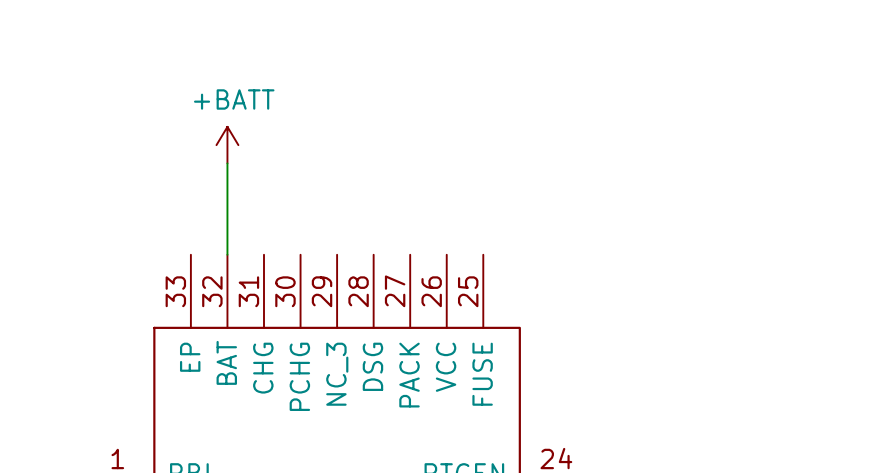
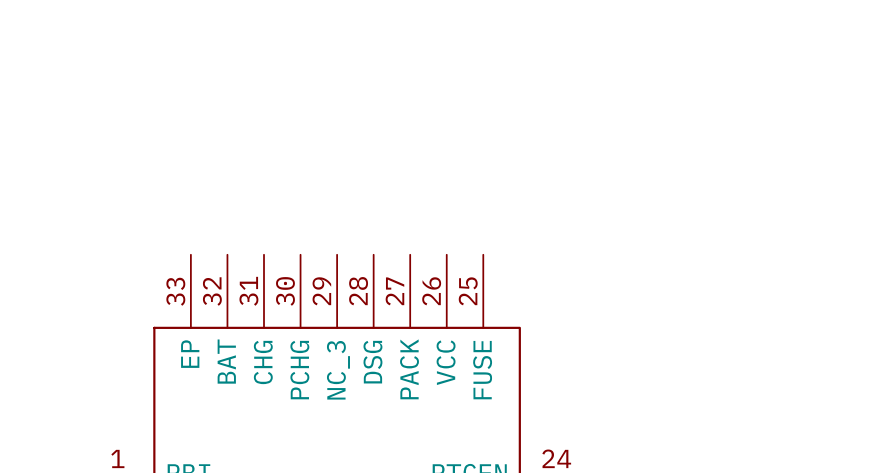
power symbol: +BATT (227, 145) -> none
wire: (227, 163) (227, 254) -> none

